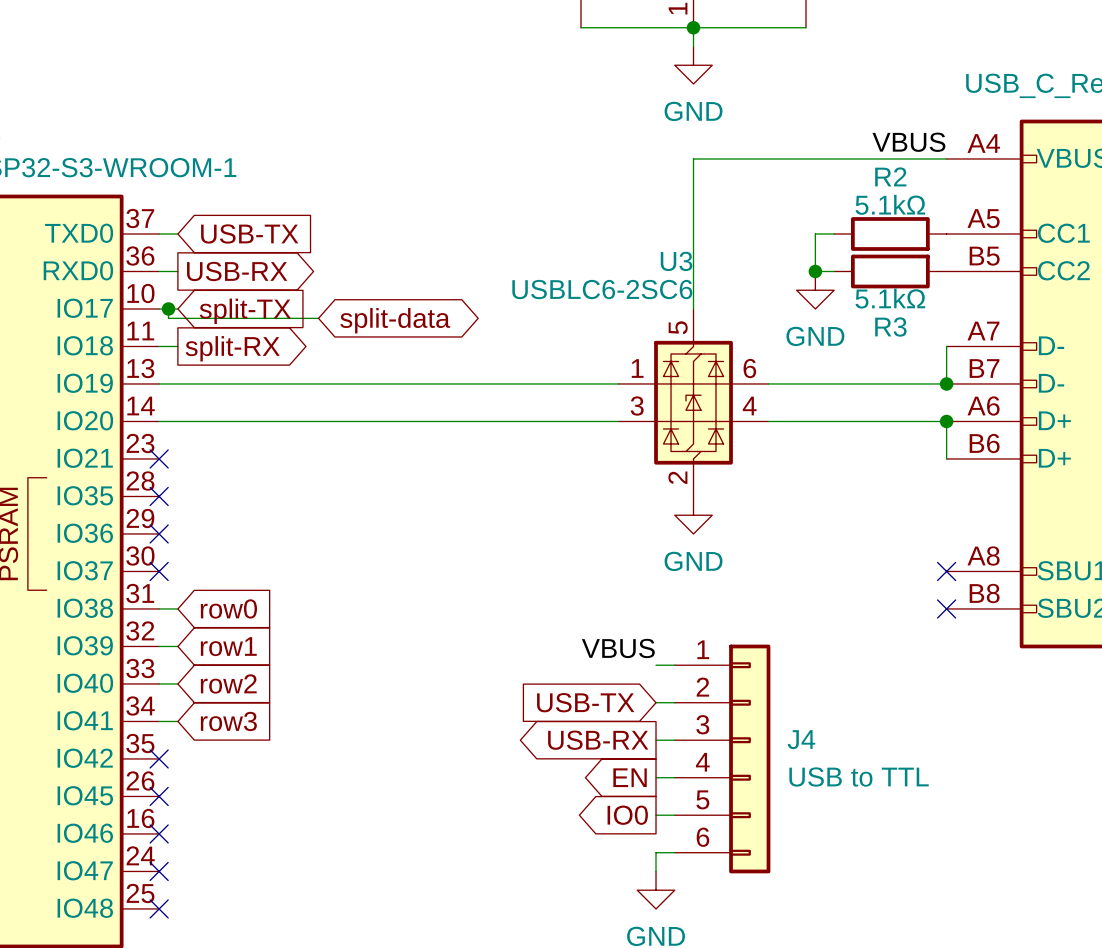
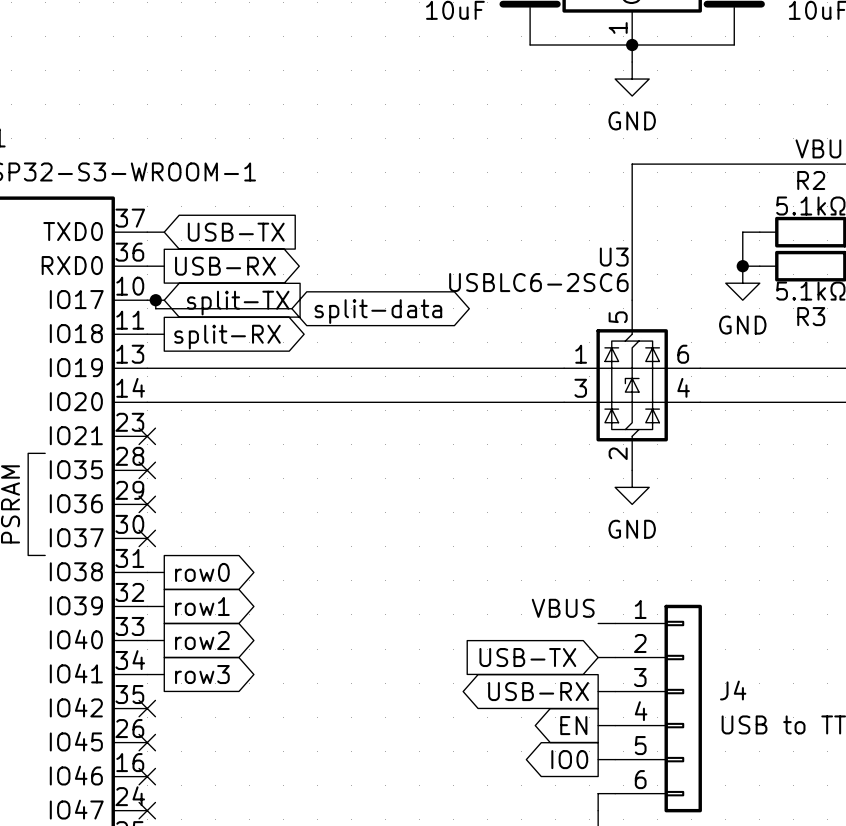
global label shape: input (228, 608) -> output (202, 572)
global label shape: input (228, 646) -> output (202, 606)
global label shape: input (228, 683) -> output (202, 640)
global label shape: input (228, 721) -> output (202, 674)

